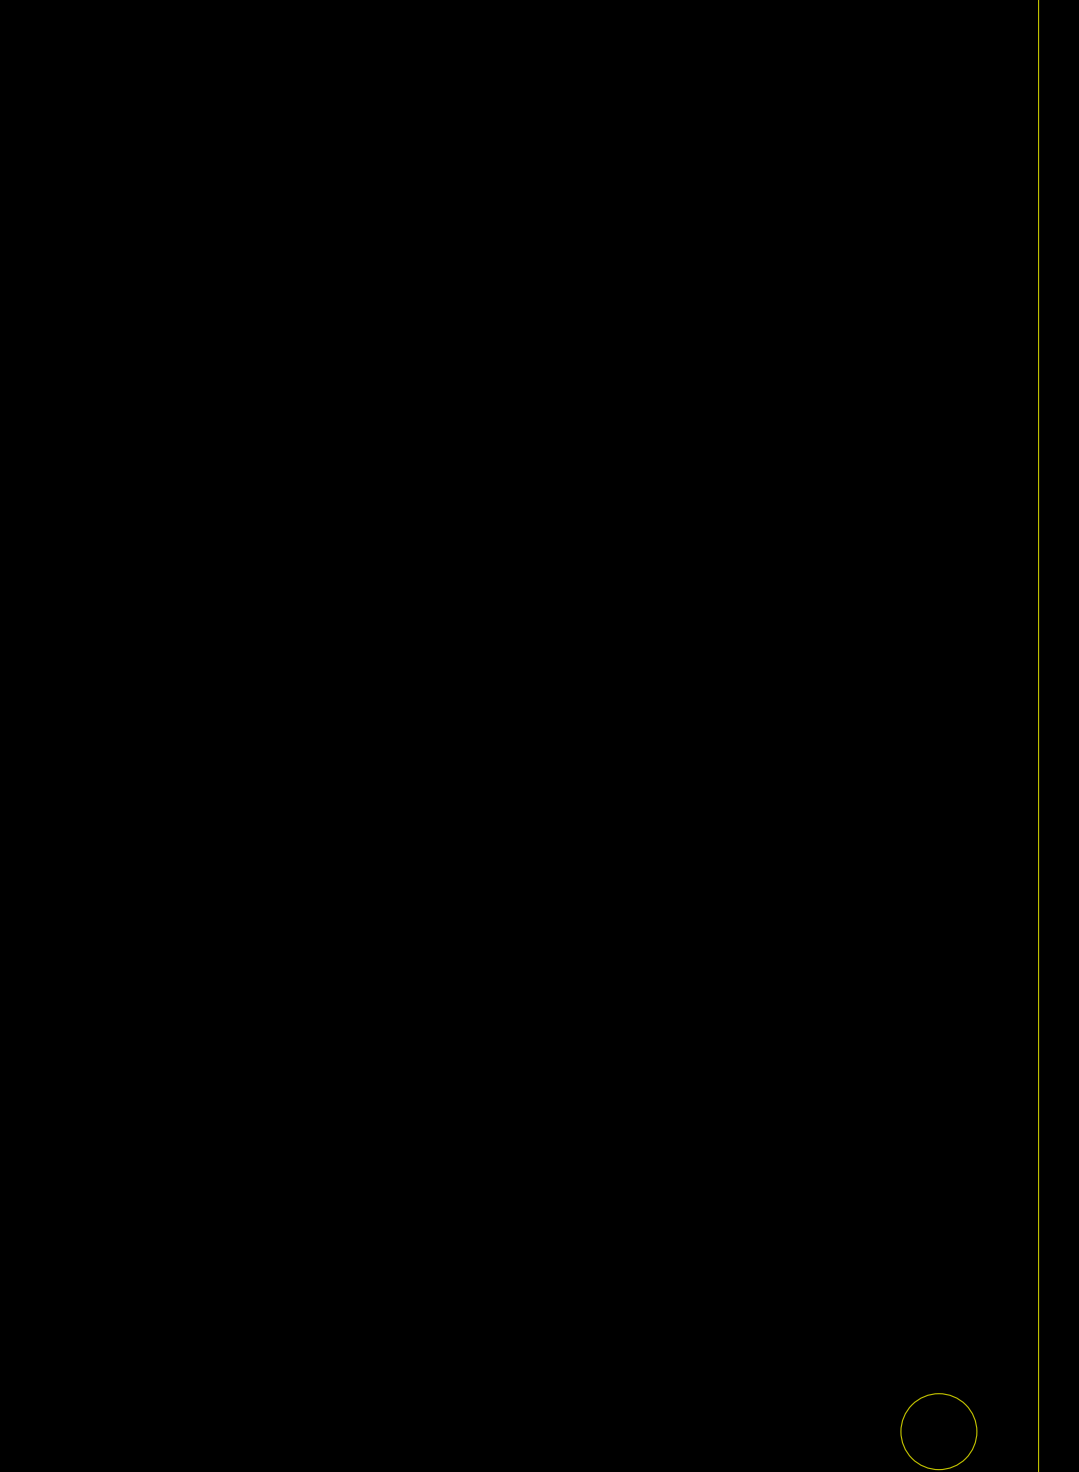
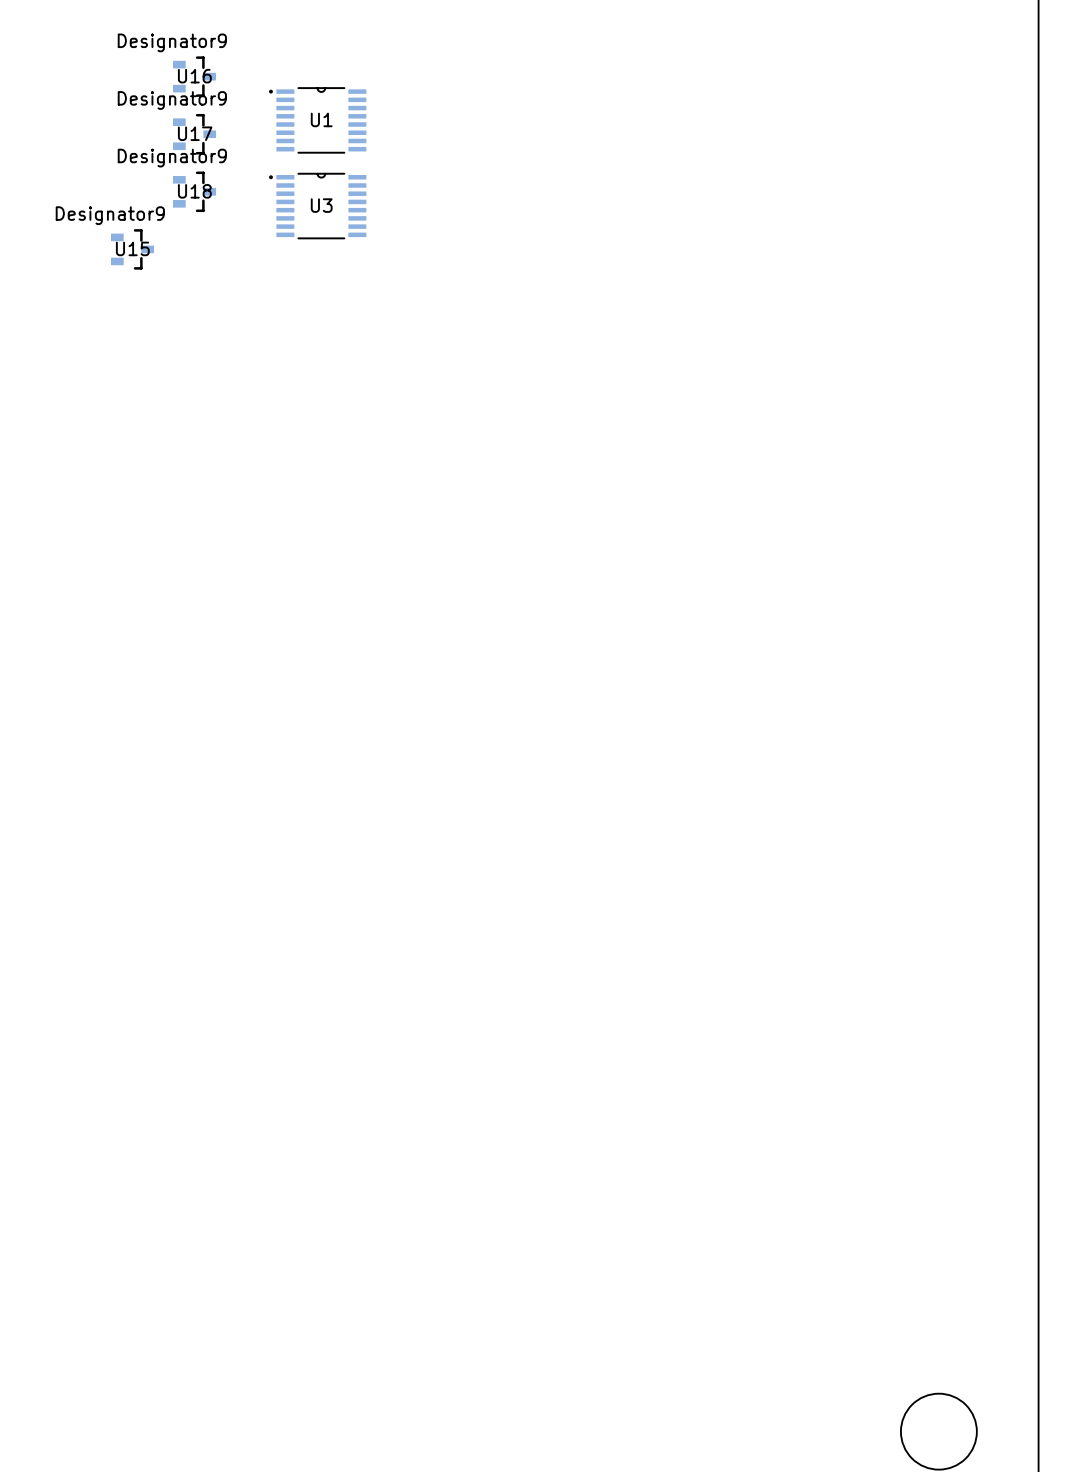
U16: none -> (194, 76)
U1: none -> (317, 120)
U17: none -> (194, 134)
U18: none -> (194, 191)
U3: none -> (317, 206)
U15: none -> (132, 249)

